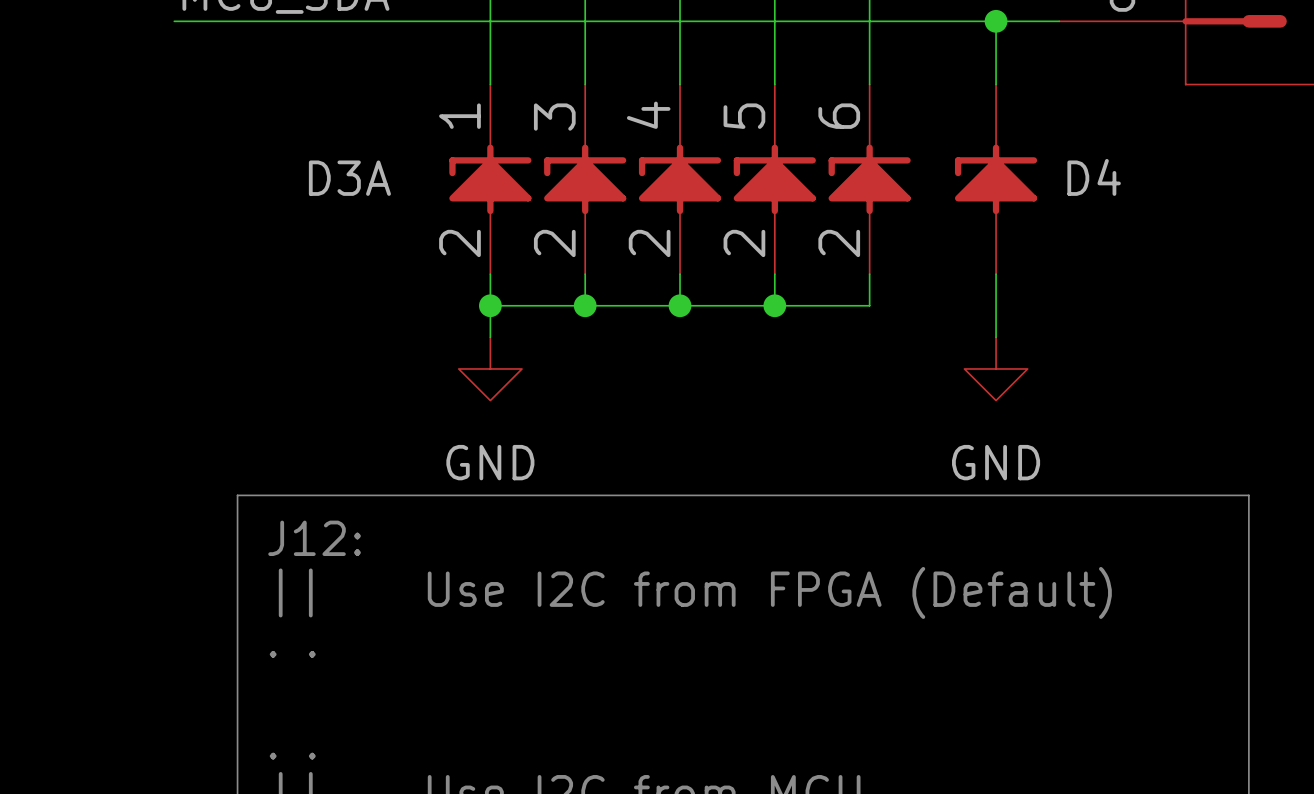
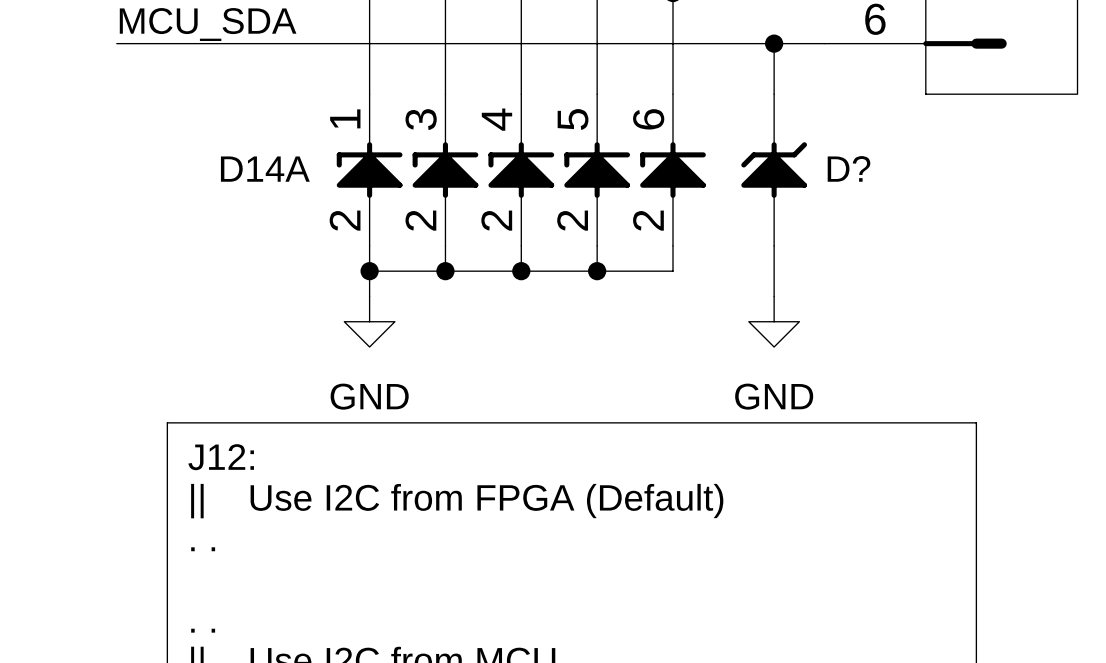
D3A name: D3A (349, 178) -> D14A (265, 169)
D4: (996, 179) -> none
D?: none -> (774, 170)

